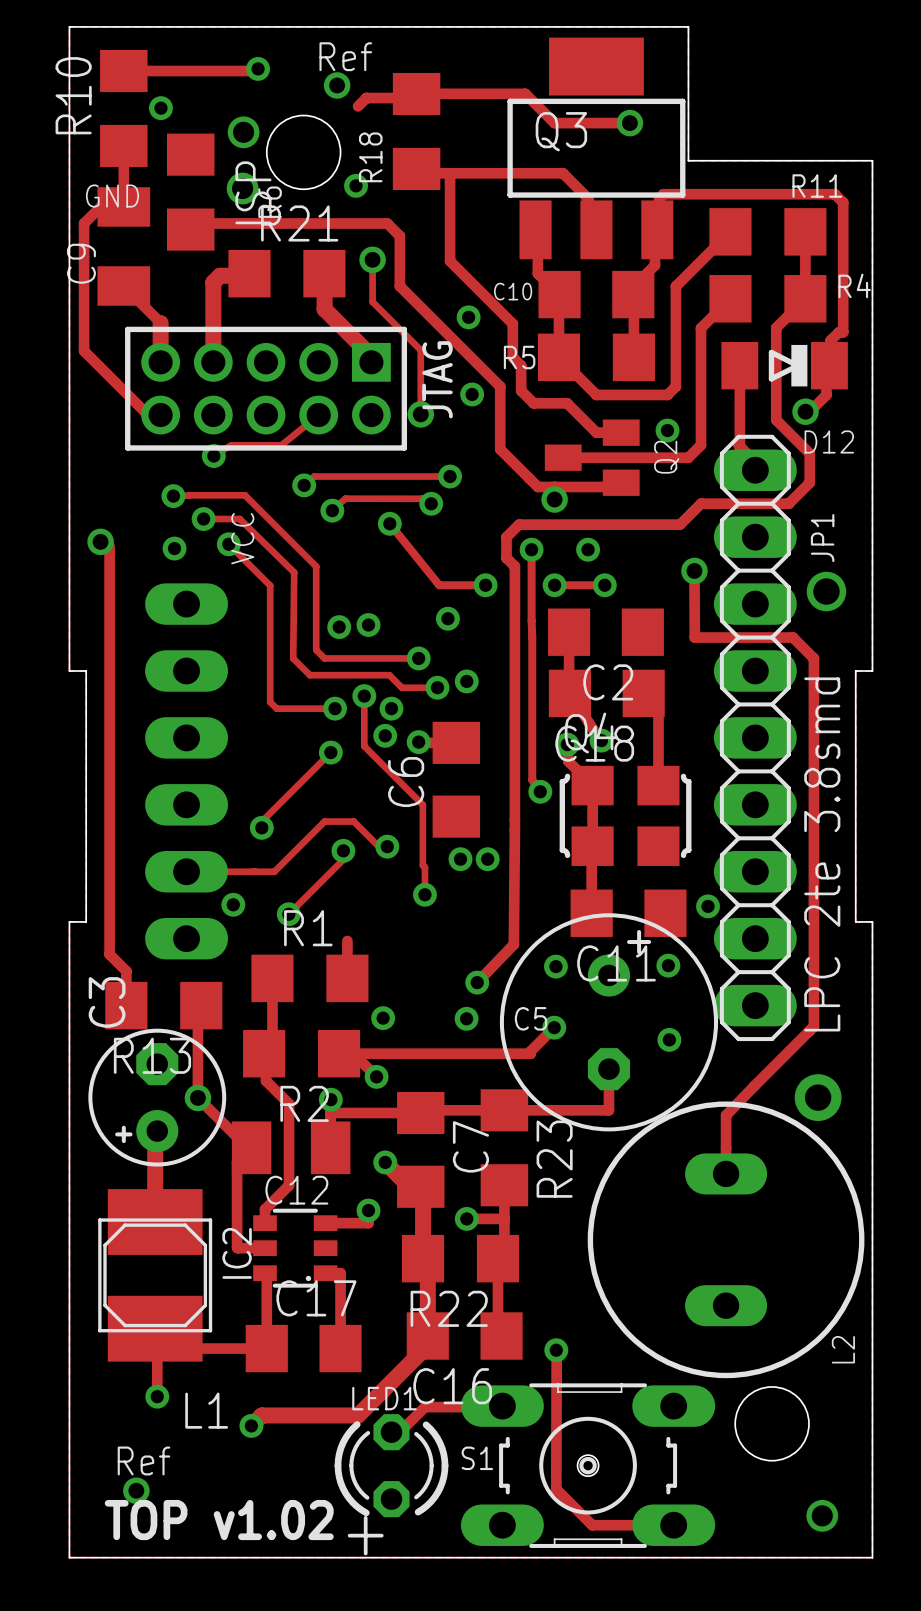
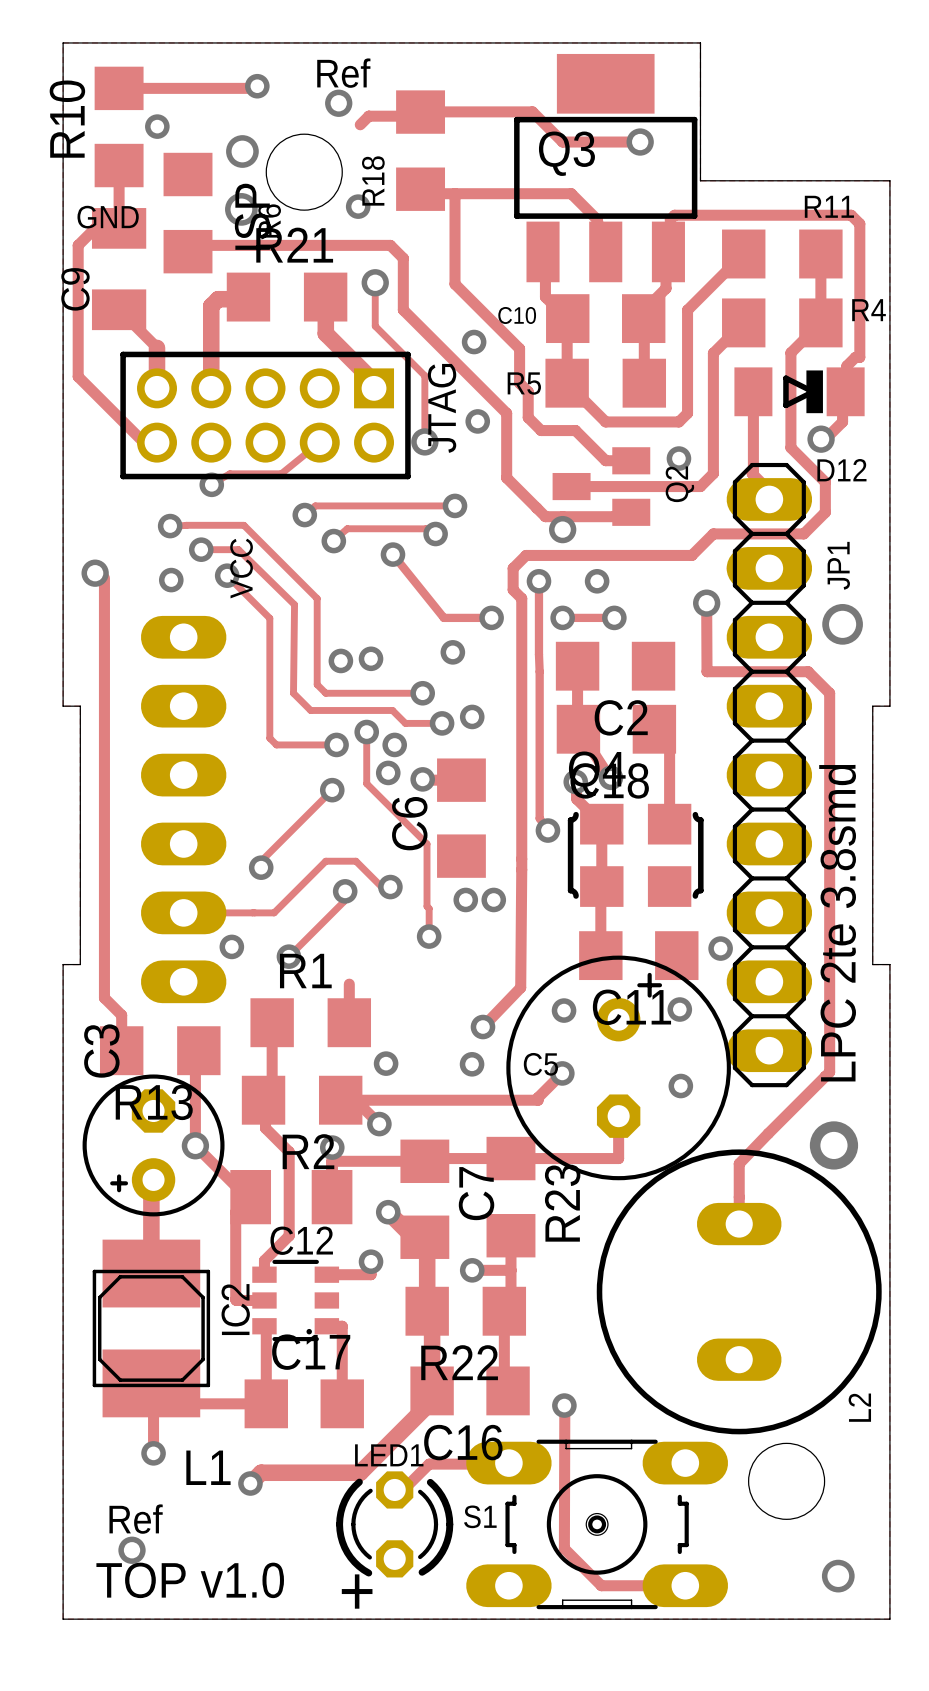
text: TOP v1.02 (219, 1520) -> TOP v1.0 (190, 1580)

